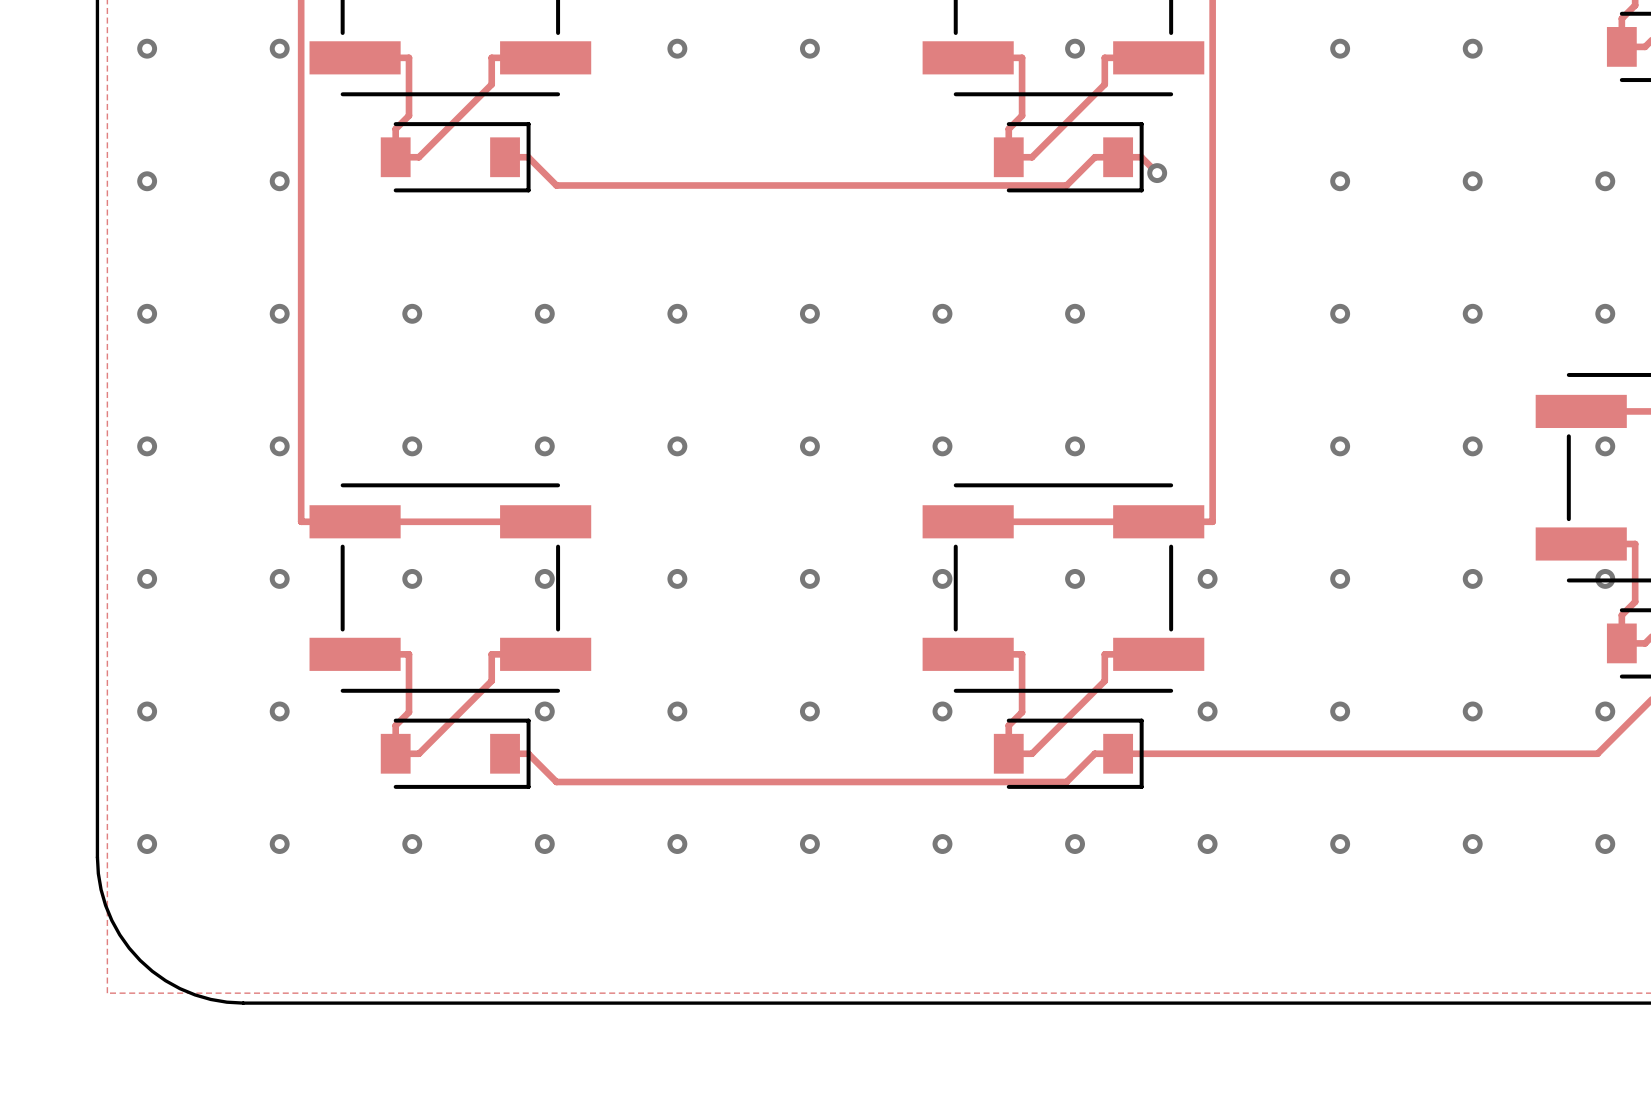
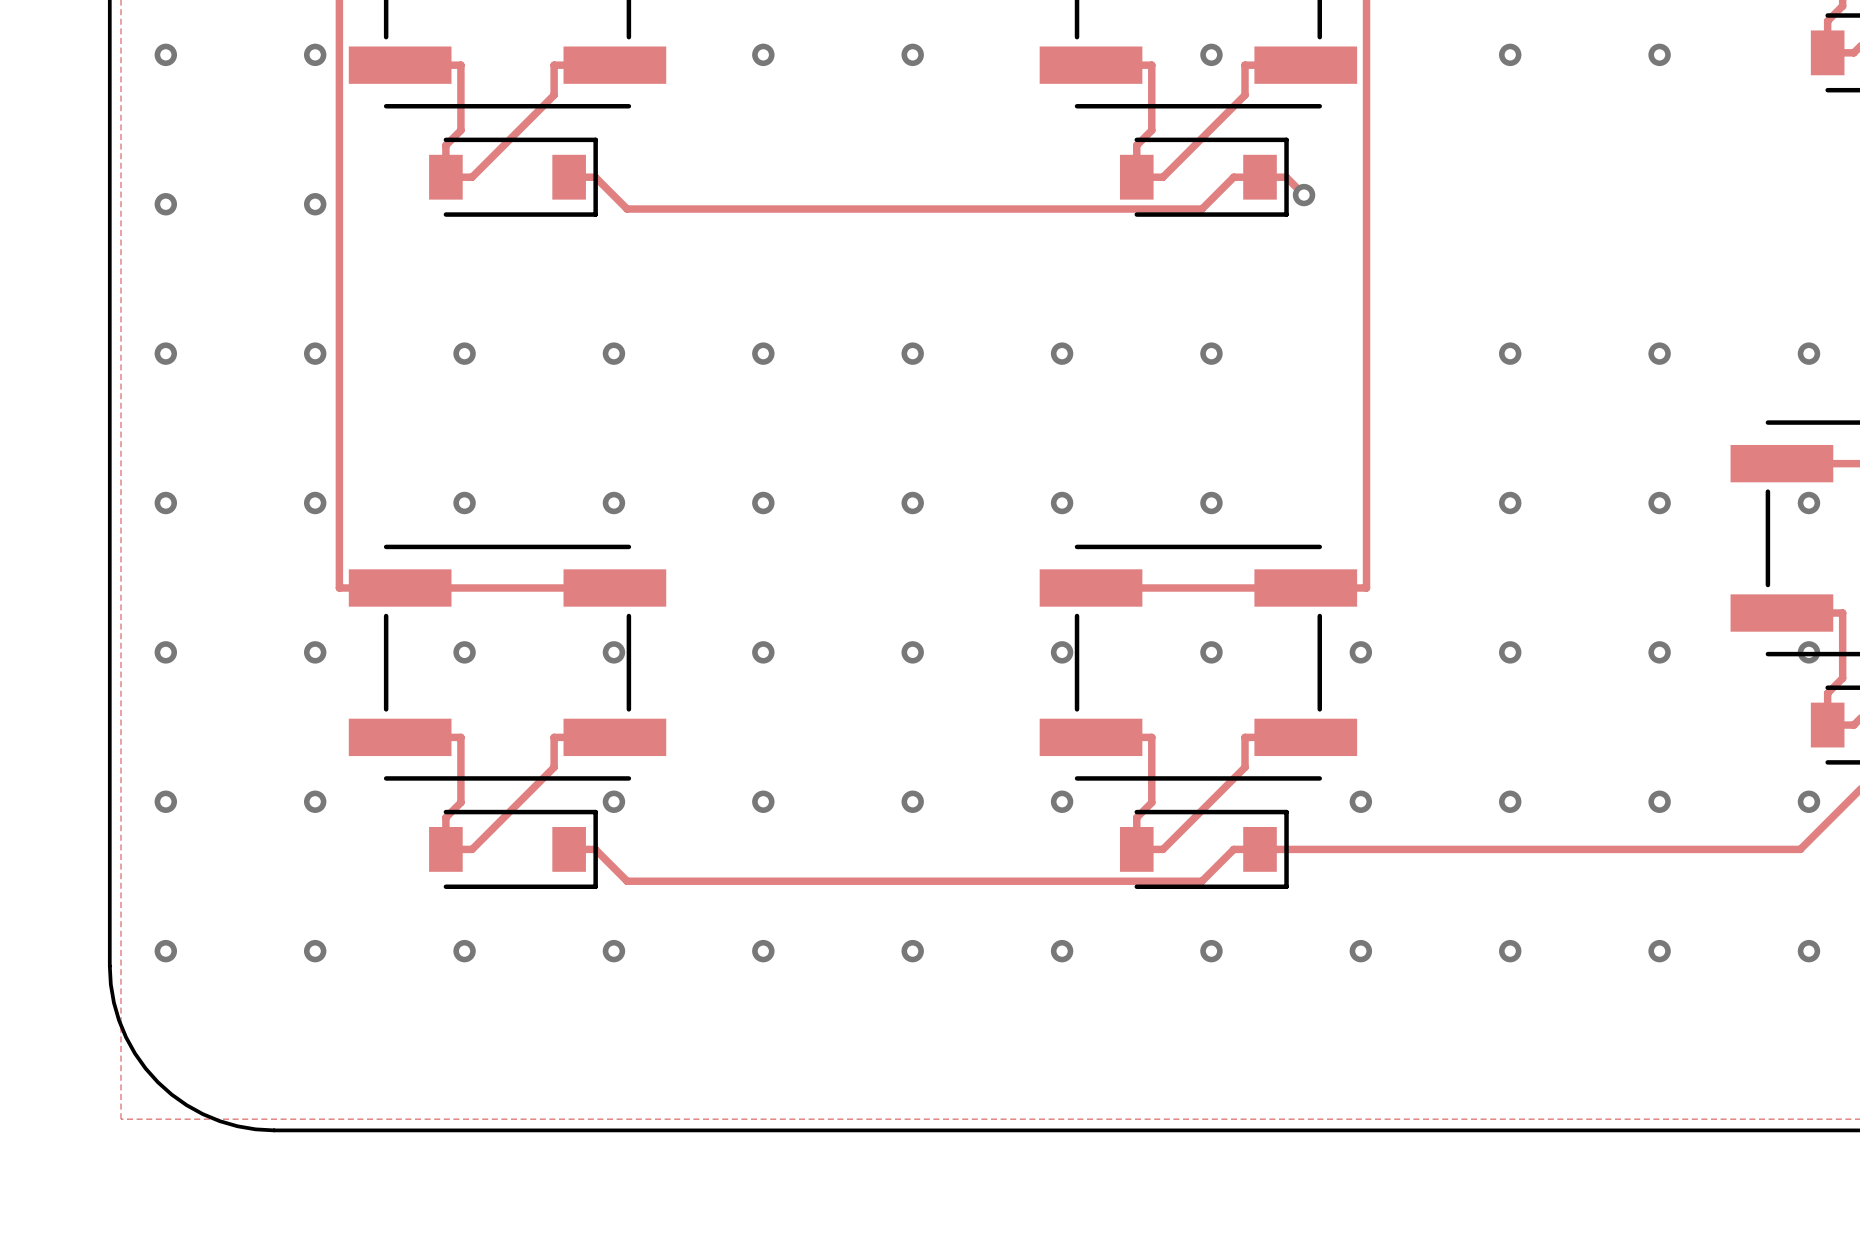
via: (1340, 181) -> none
via: (1472, 181) -> none
via: (1605, 181) -> none

